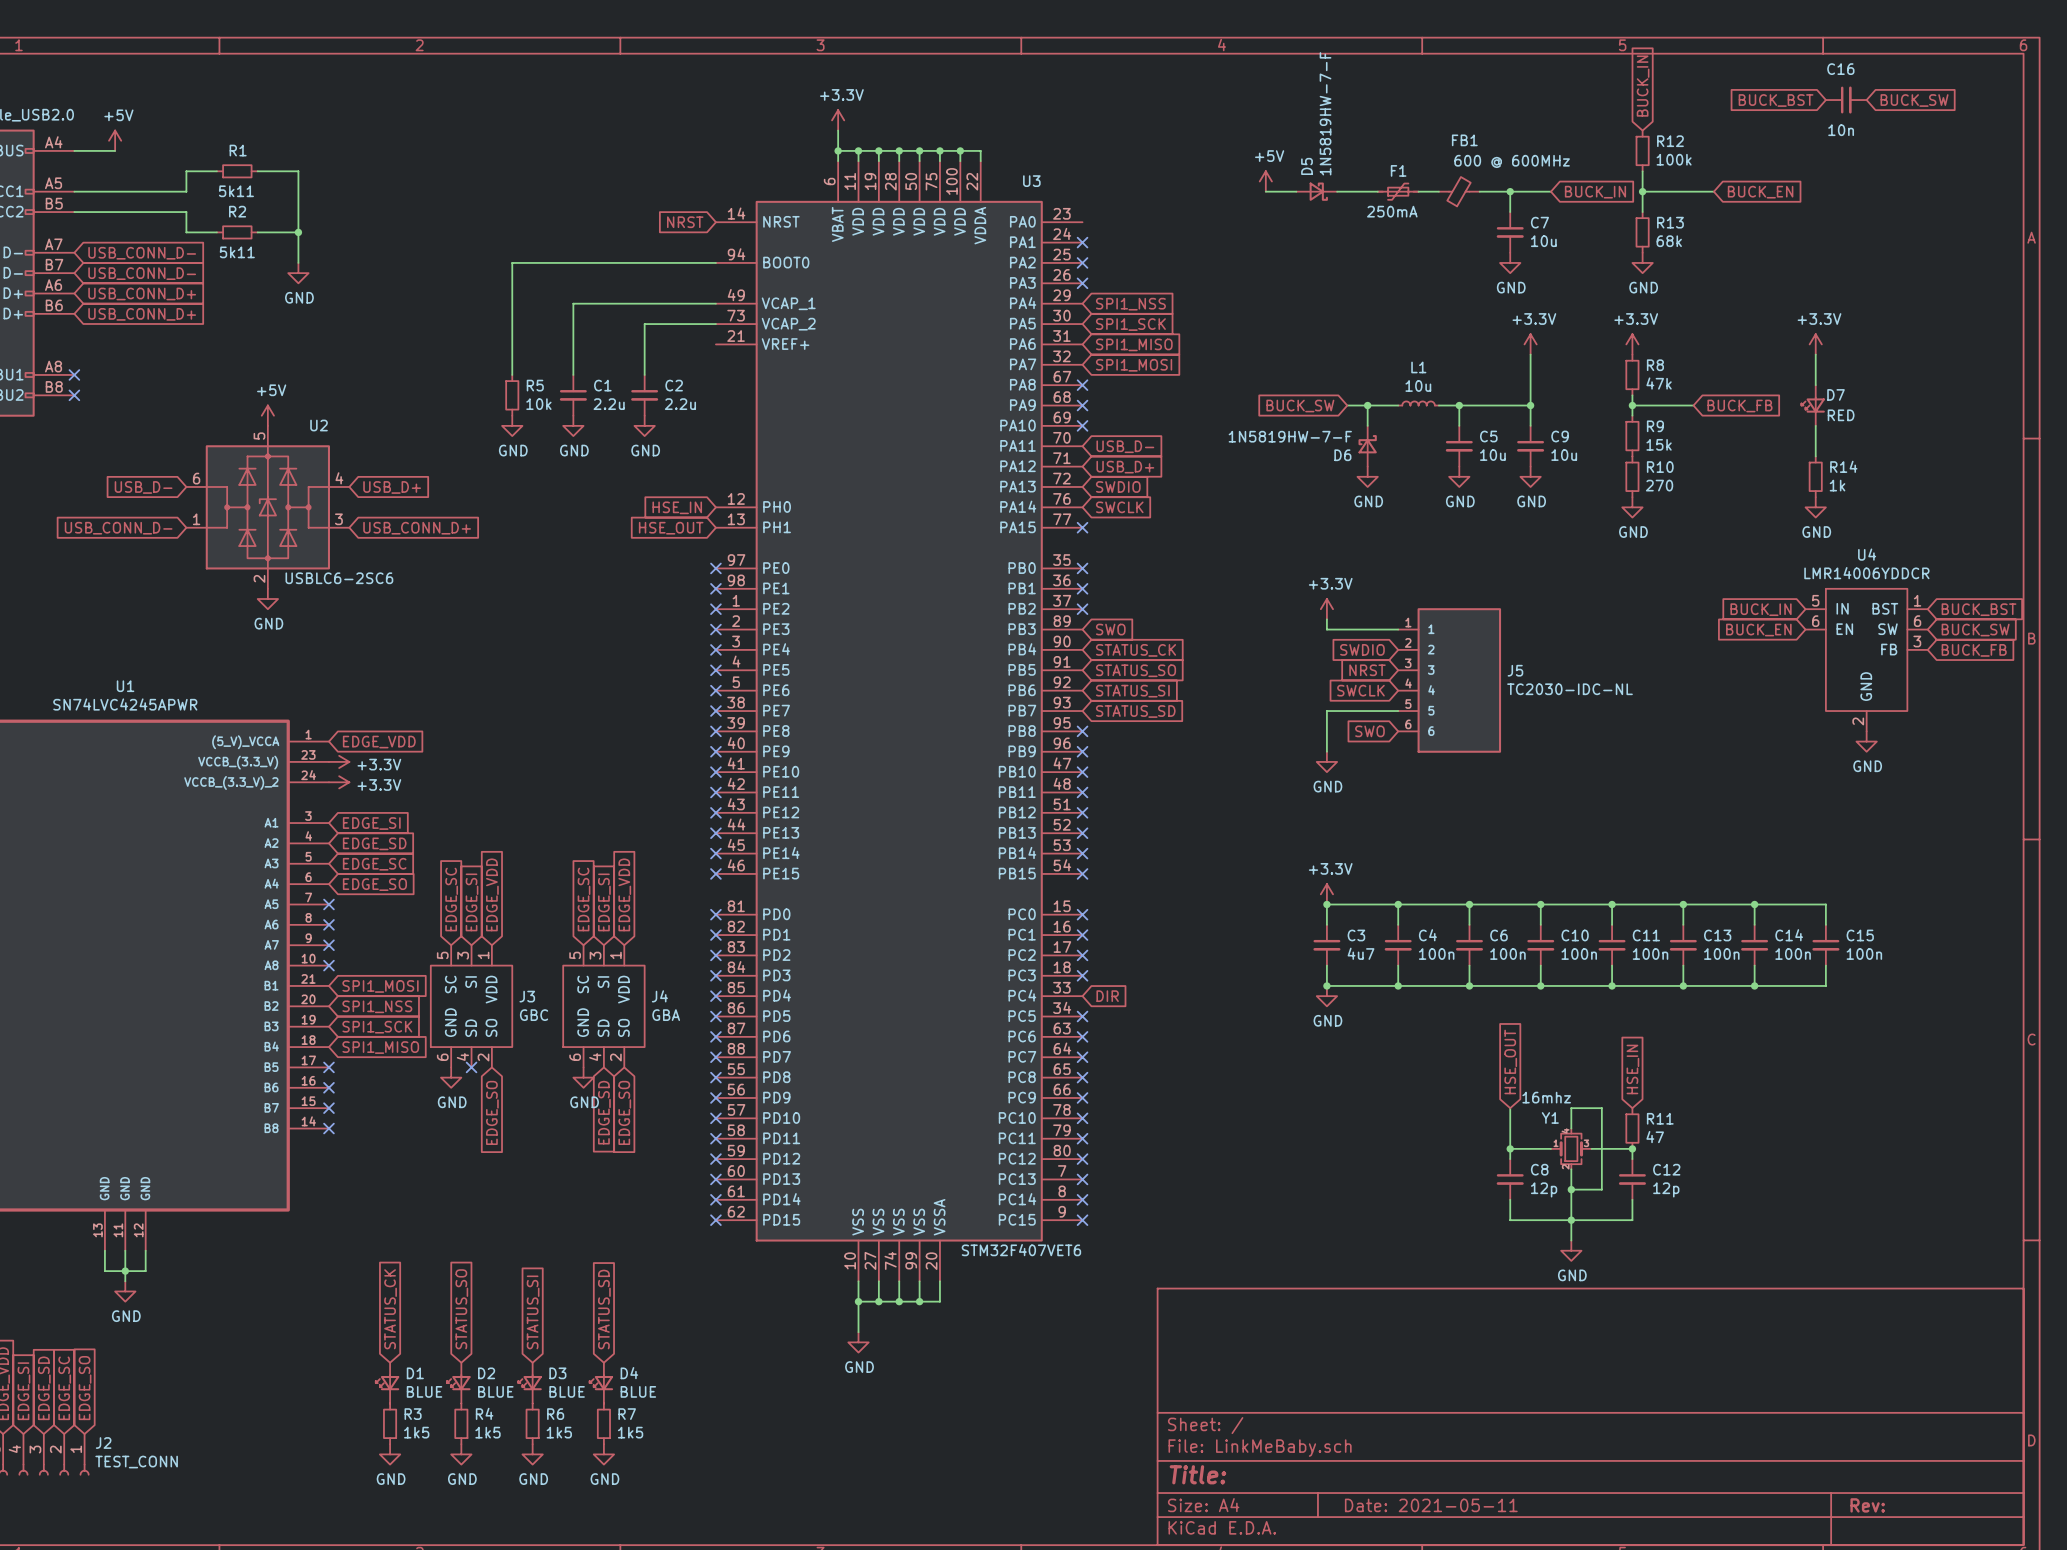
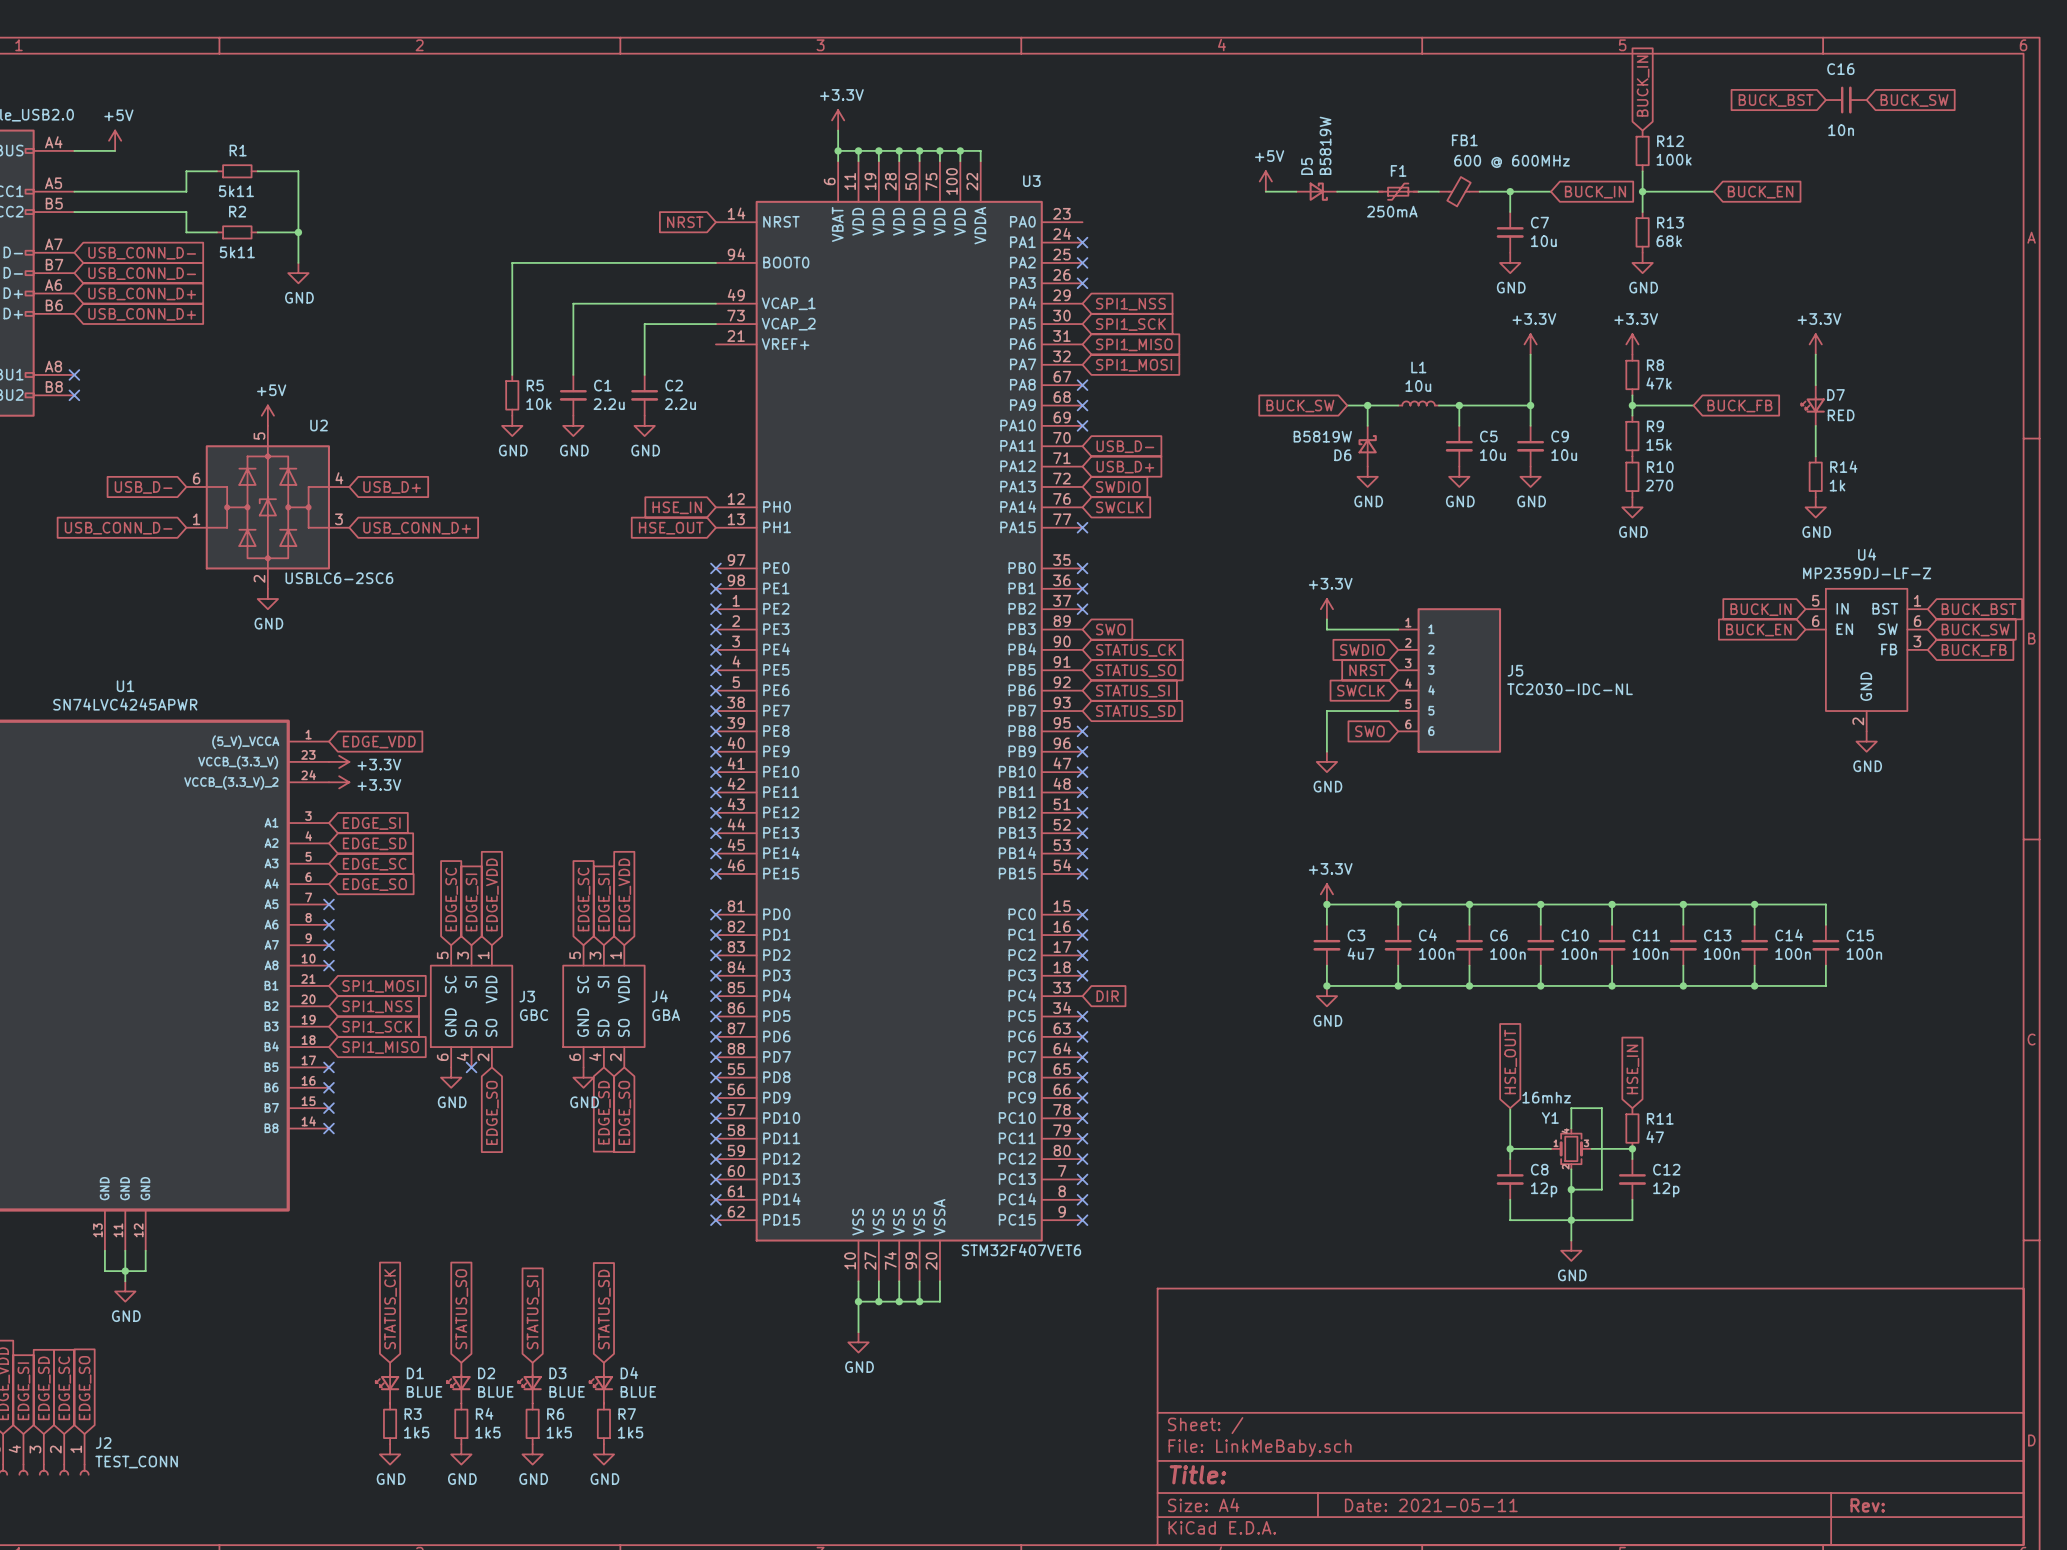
D5 value: 1N5819HW-7-F (1325, 113) -> B5819W (1325, 145)
D6 value: 1N5819HW-7-F (1290, 436) -> B5819W (1322, 436)
U4 value: LMR14006YDDCR (1866, 573) -> MP2359DJ-LF-Z (1867, 573)

